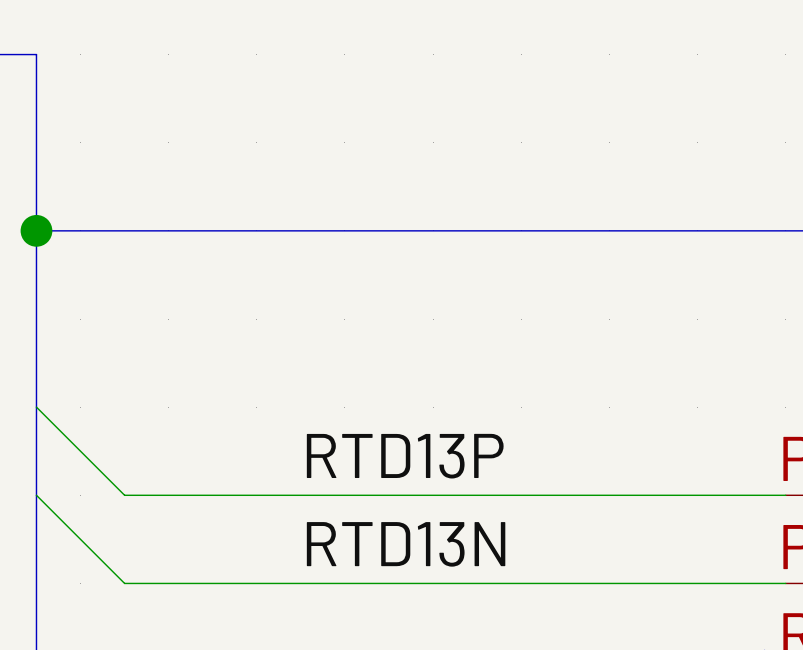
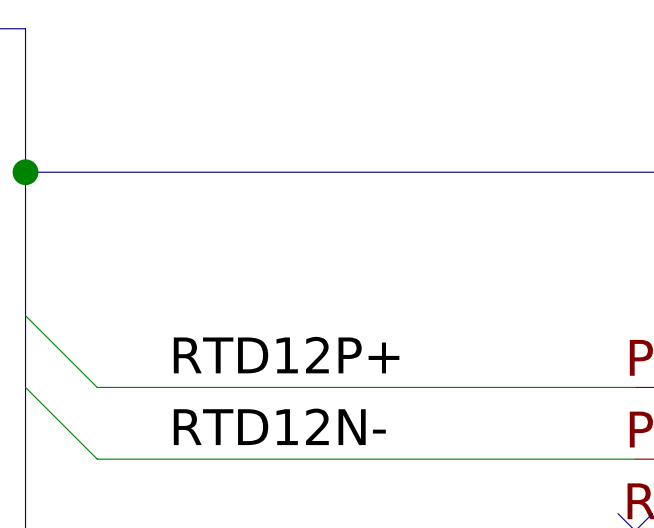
label: none -> RTD12P+ (286, 355)
label: RTD13P (405, 456) -> none
label: none -> RTD12N- (279, 426)
label: RTD13N (406, 544) -> none

